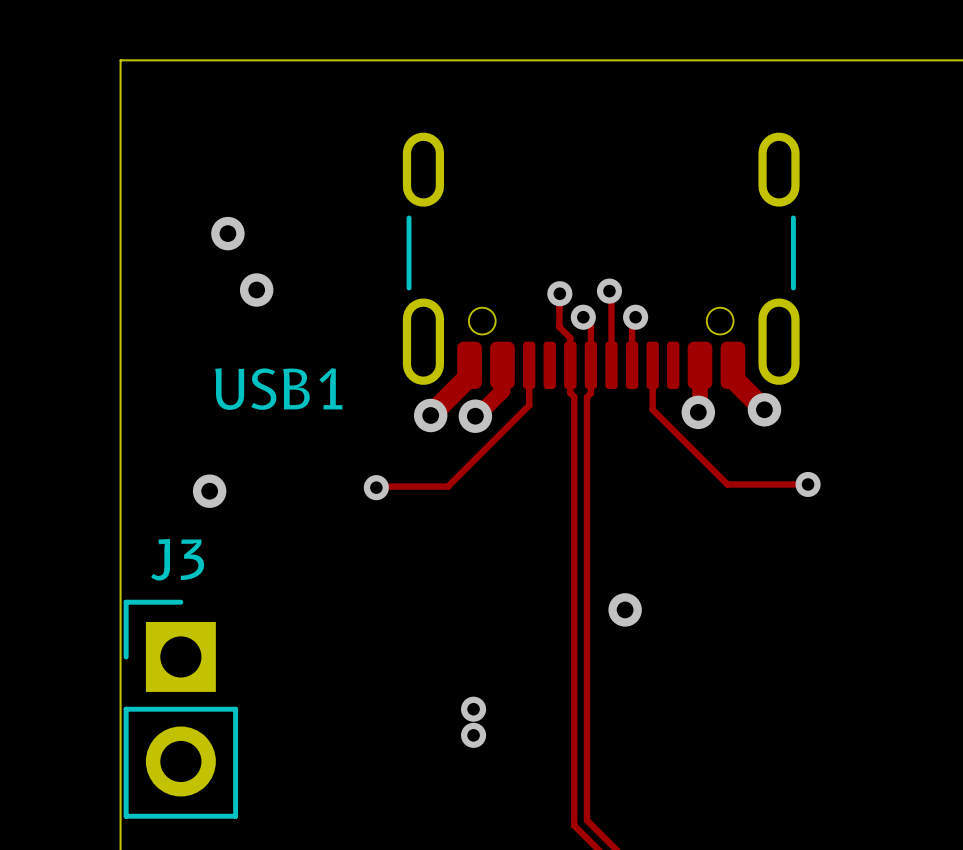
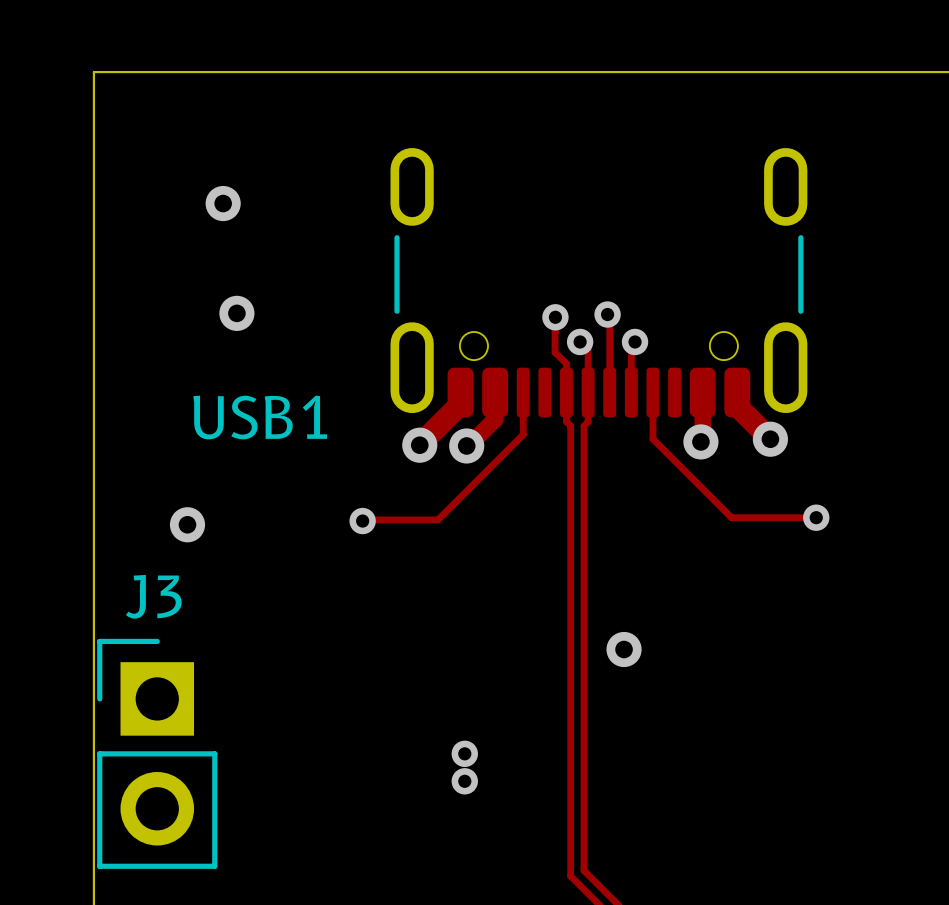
via position: (227, 233) -> (223, 203)

